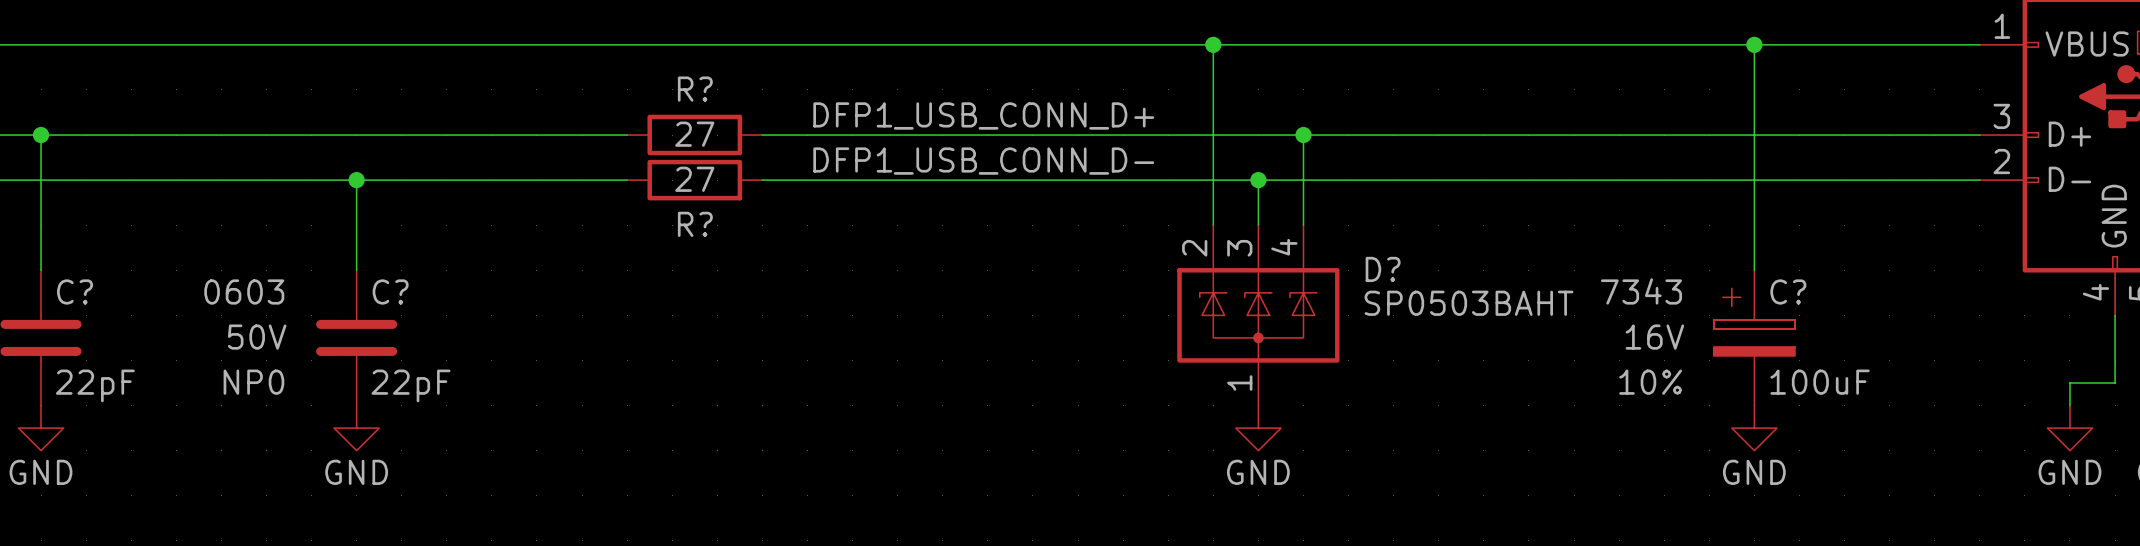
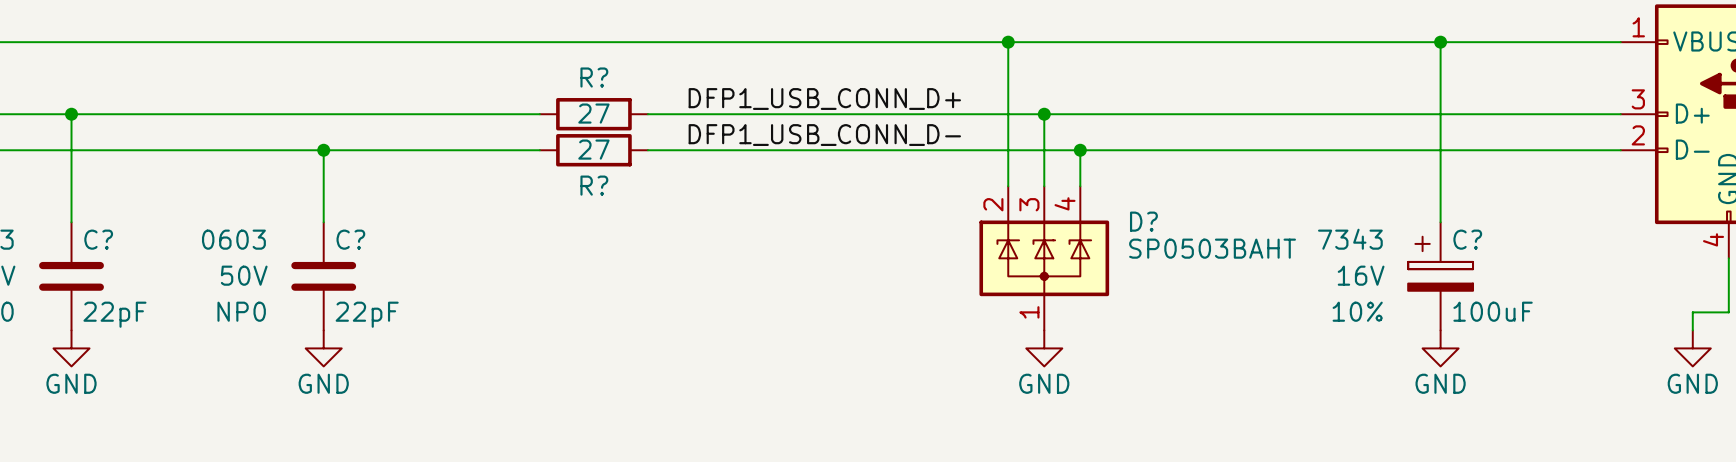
junction: none -> (1044, 114)
wire: (1303, 135) (1303, 180) -> (1044, 114) (1044, 150)
junction: (1303, 135) -> none
junction: (1258, 180) -> none
junction: none -> (1080, 150)

